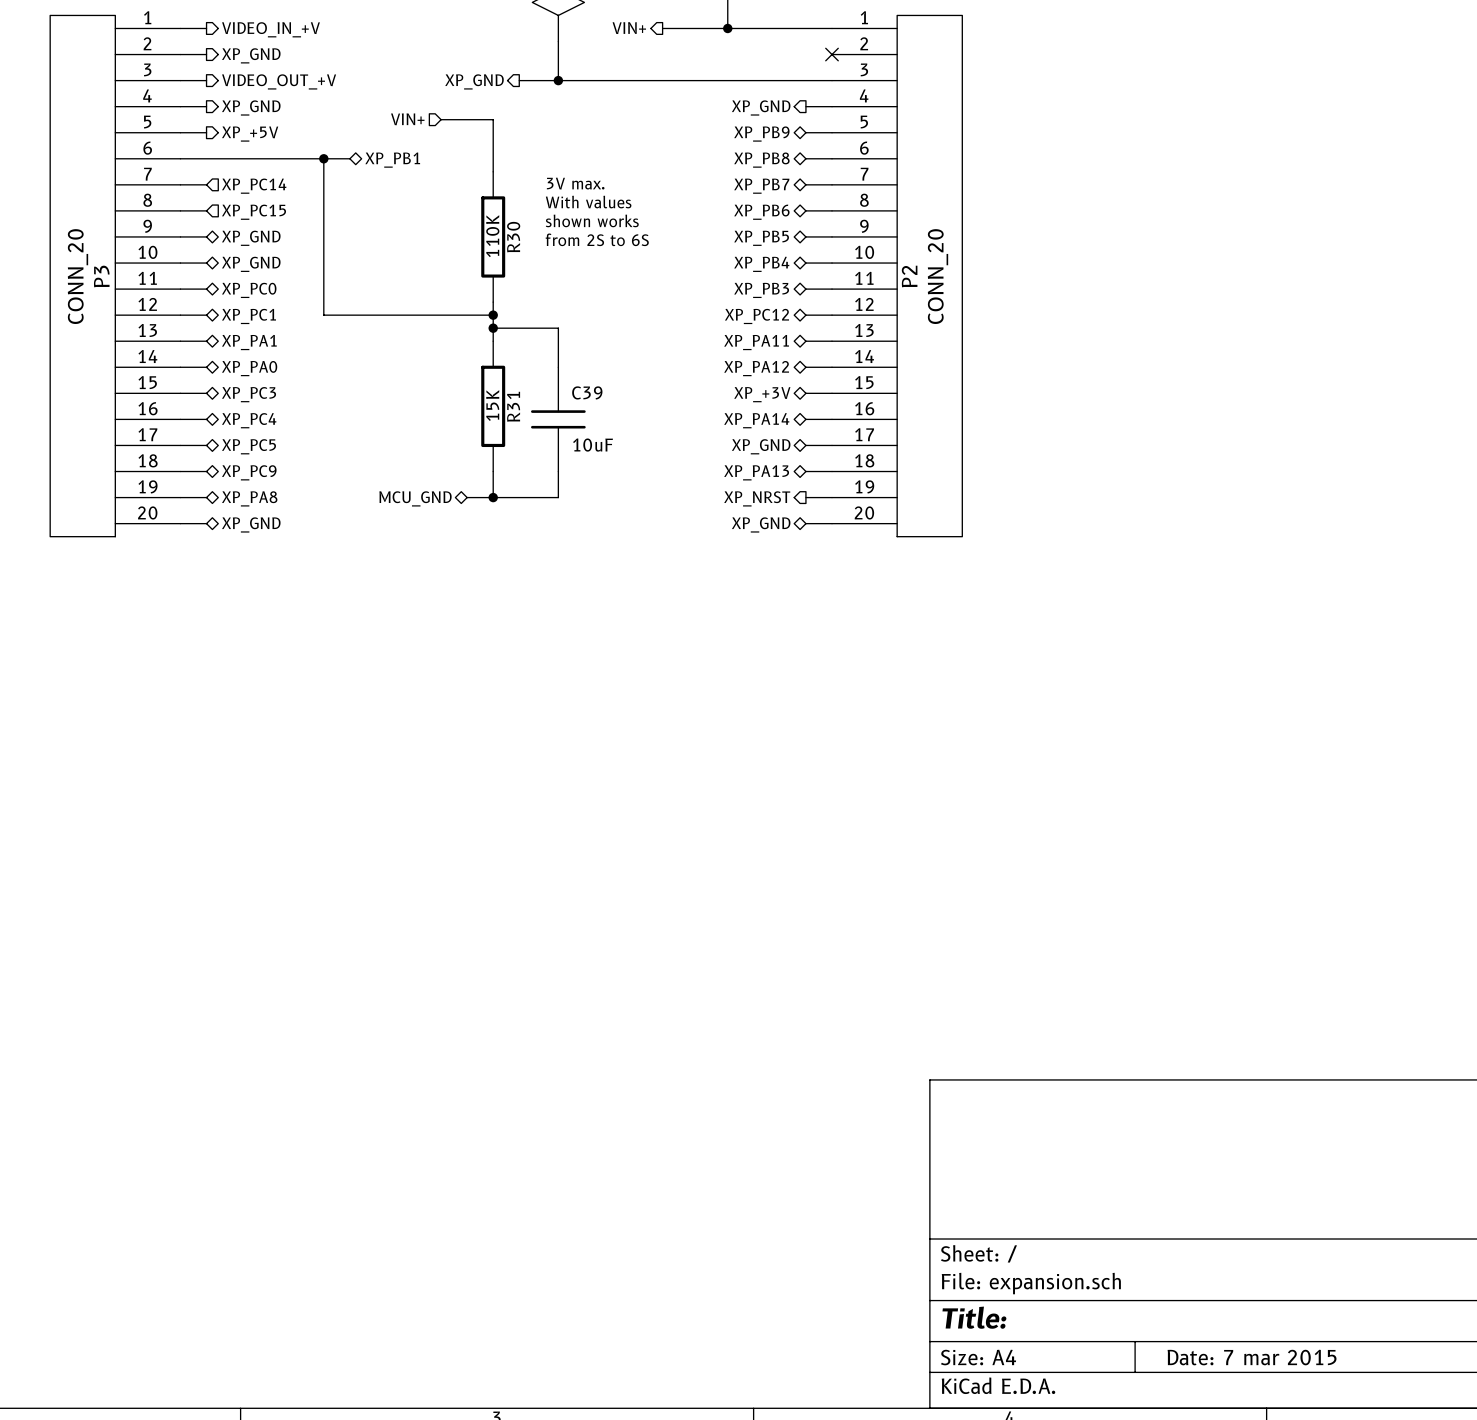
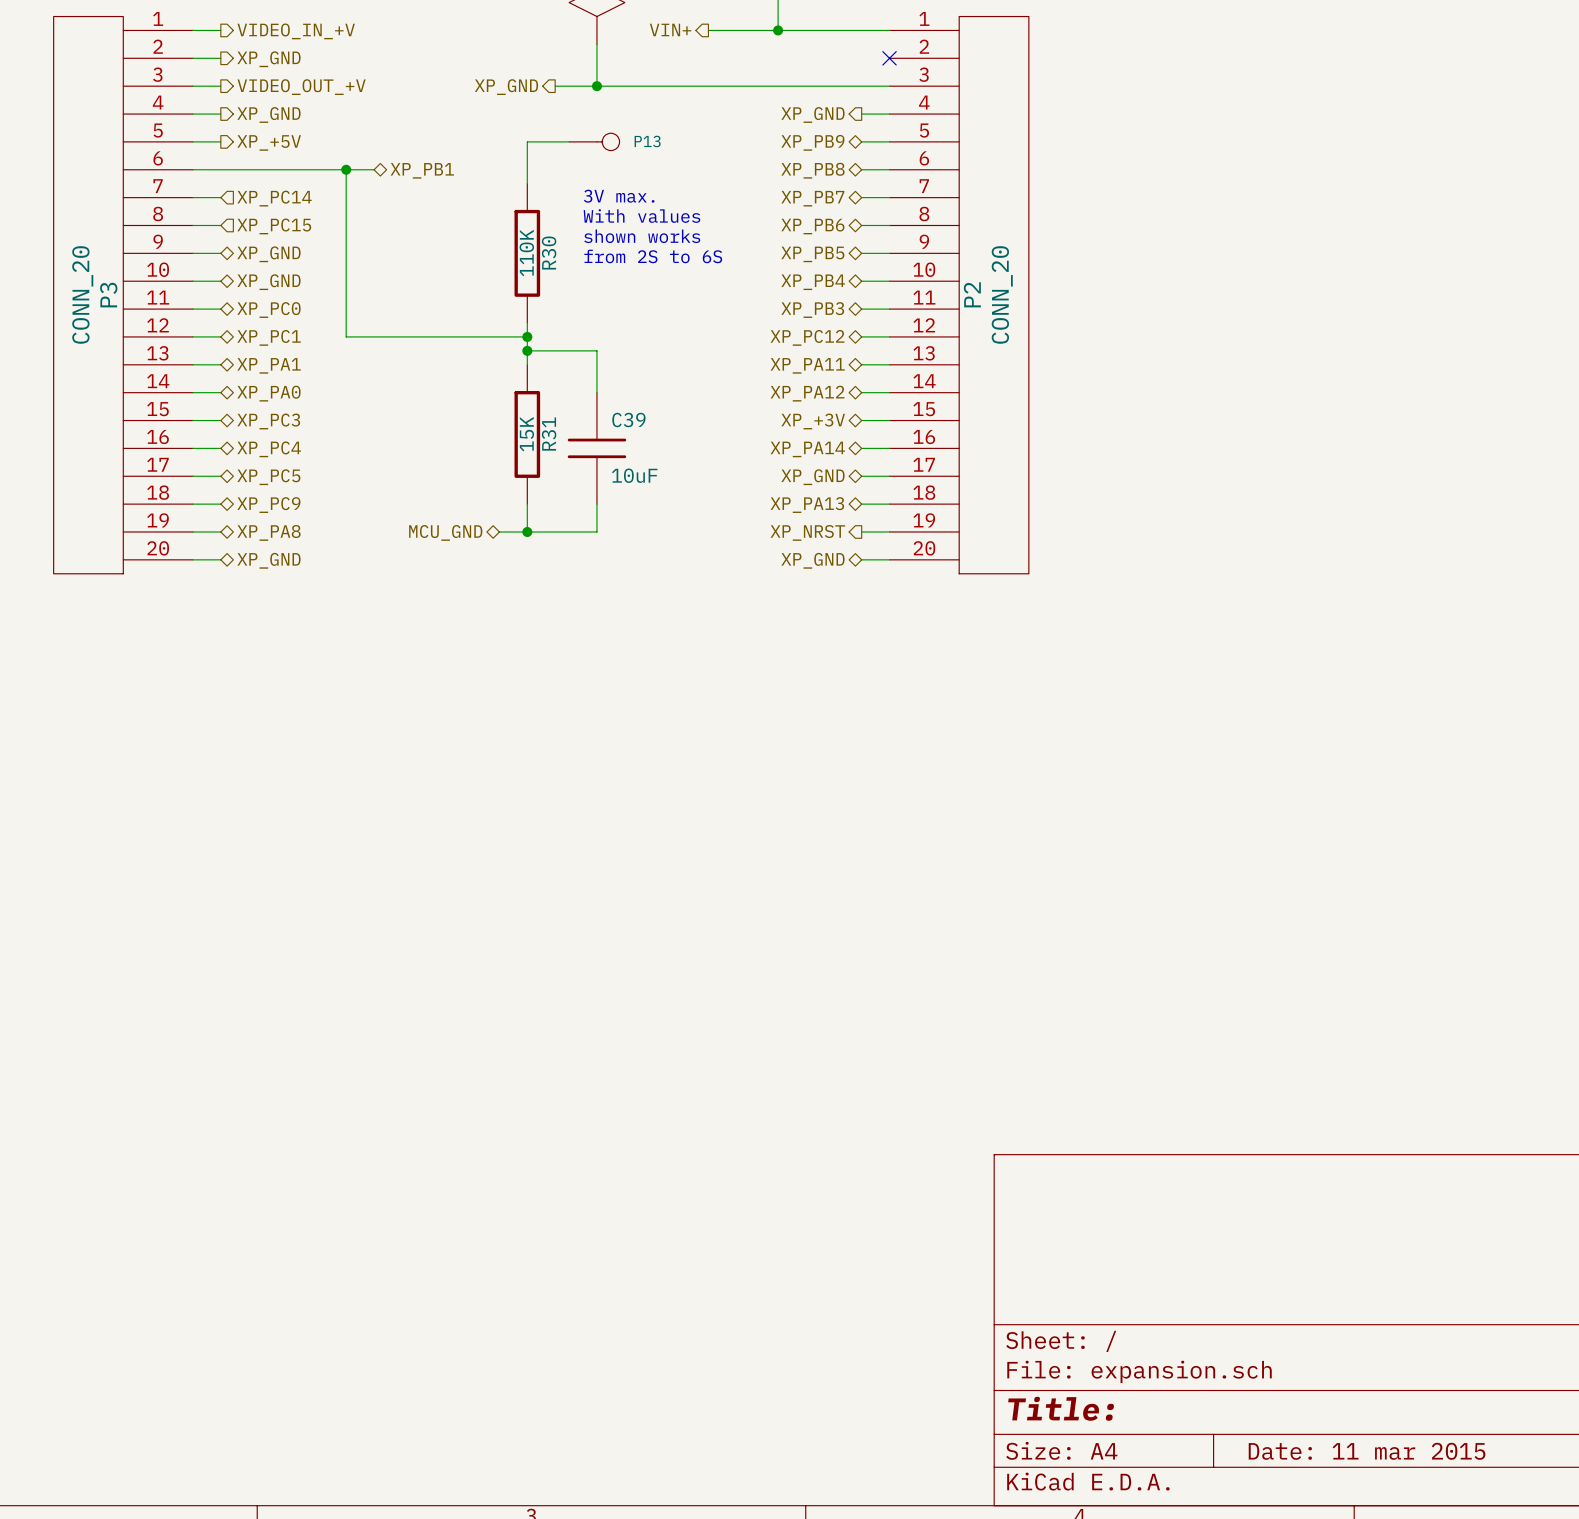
hierarchical label: VIN+ (407, 119) -> none
wire: (441, 119) (493, 119) (493, 132) -> (569, 141) (527, 141)
P13: none -> (594, 141)
title block: Date: 7 mar 2015 (1252, 1357) -> Date: 11 mar 2015 (1367, 1451)

